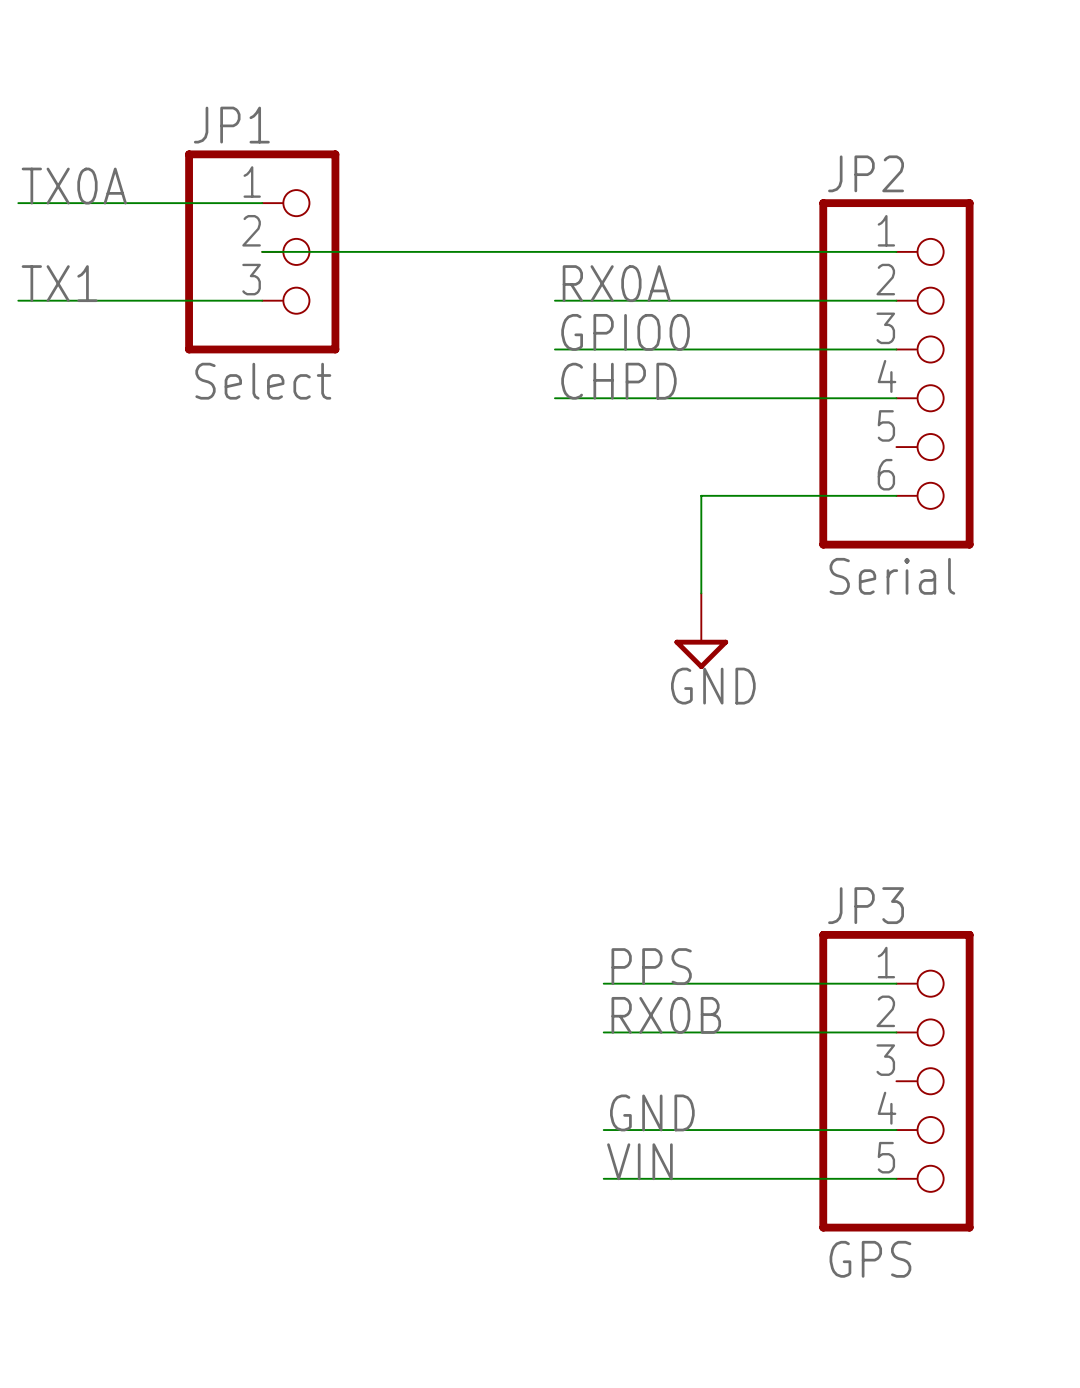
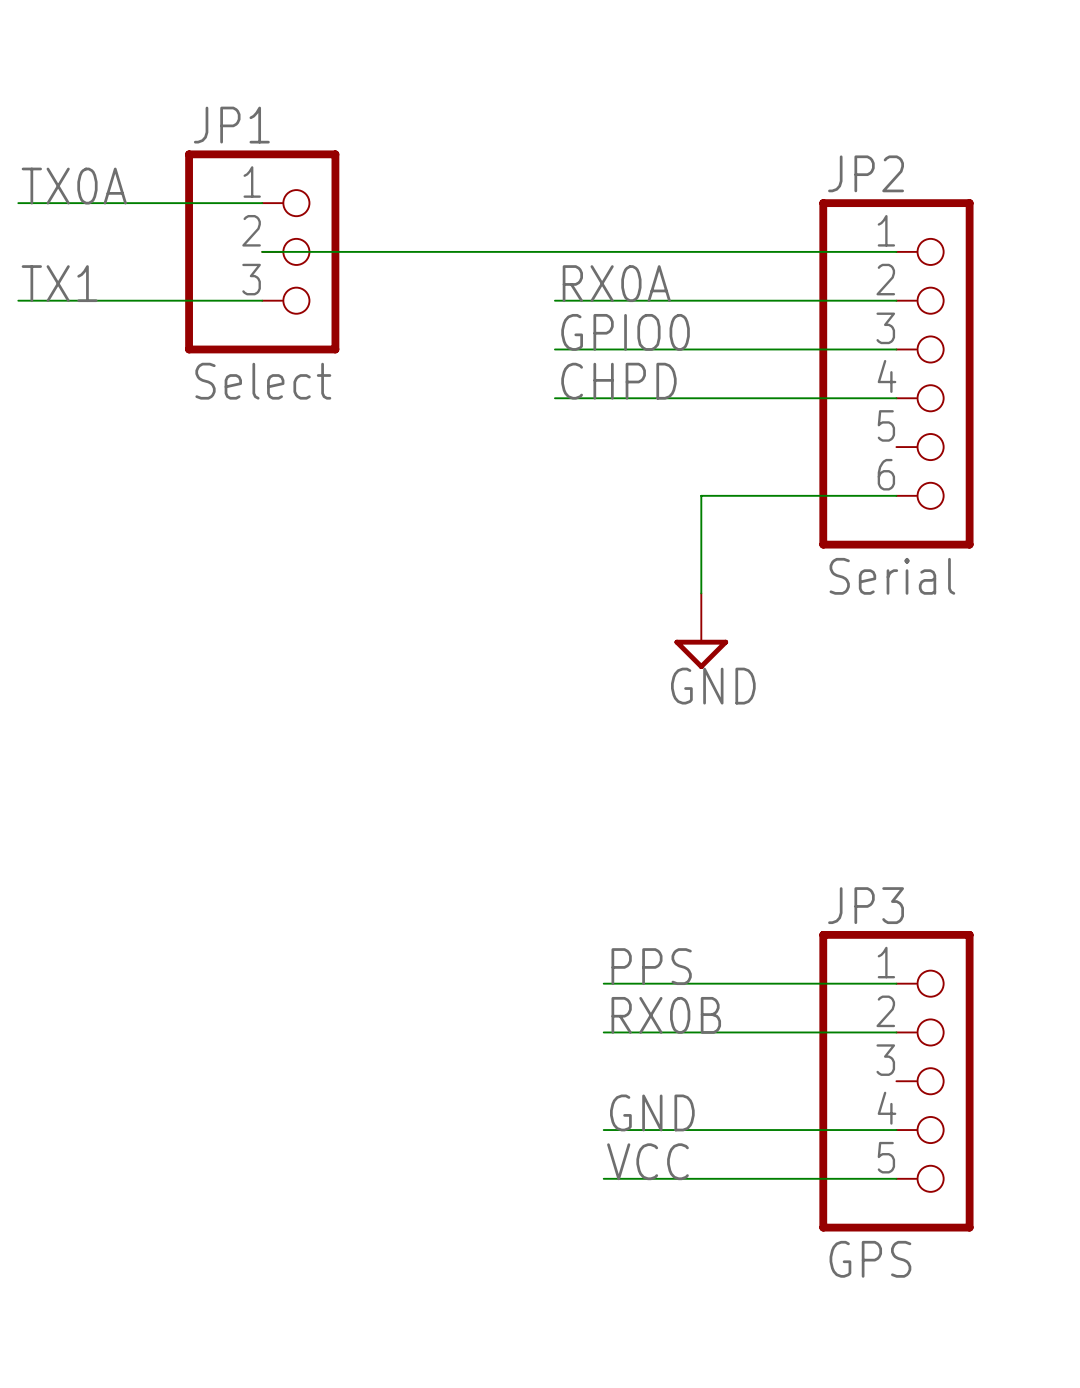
label: VIN (639, 1161) -> VCC (647, 1161)

